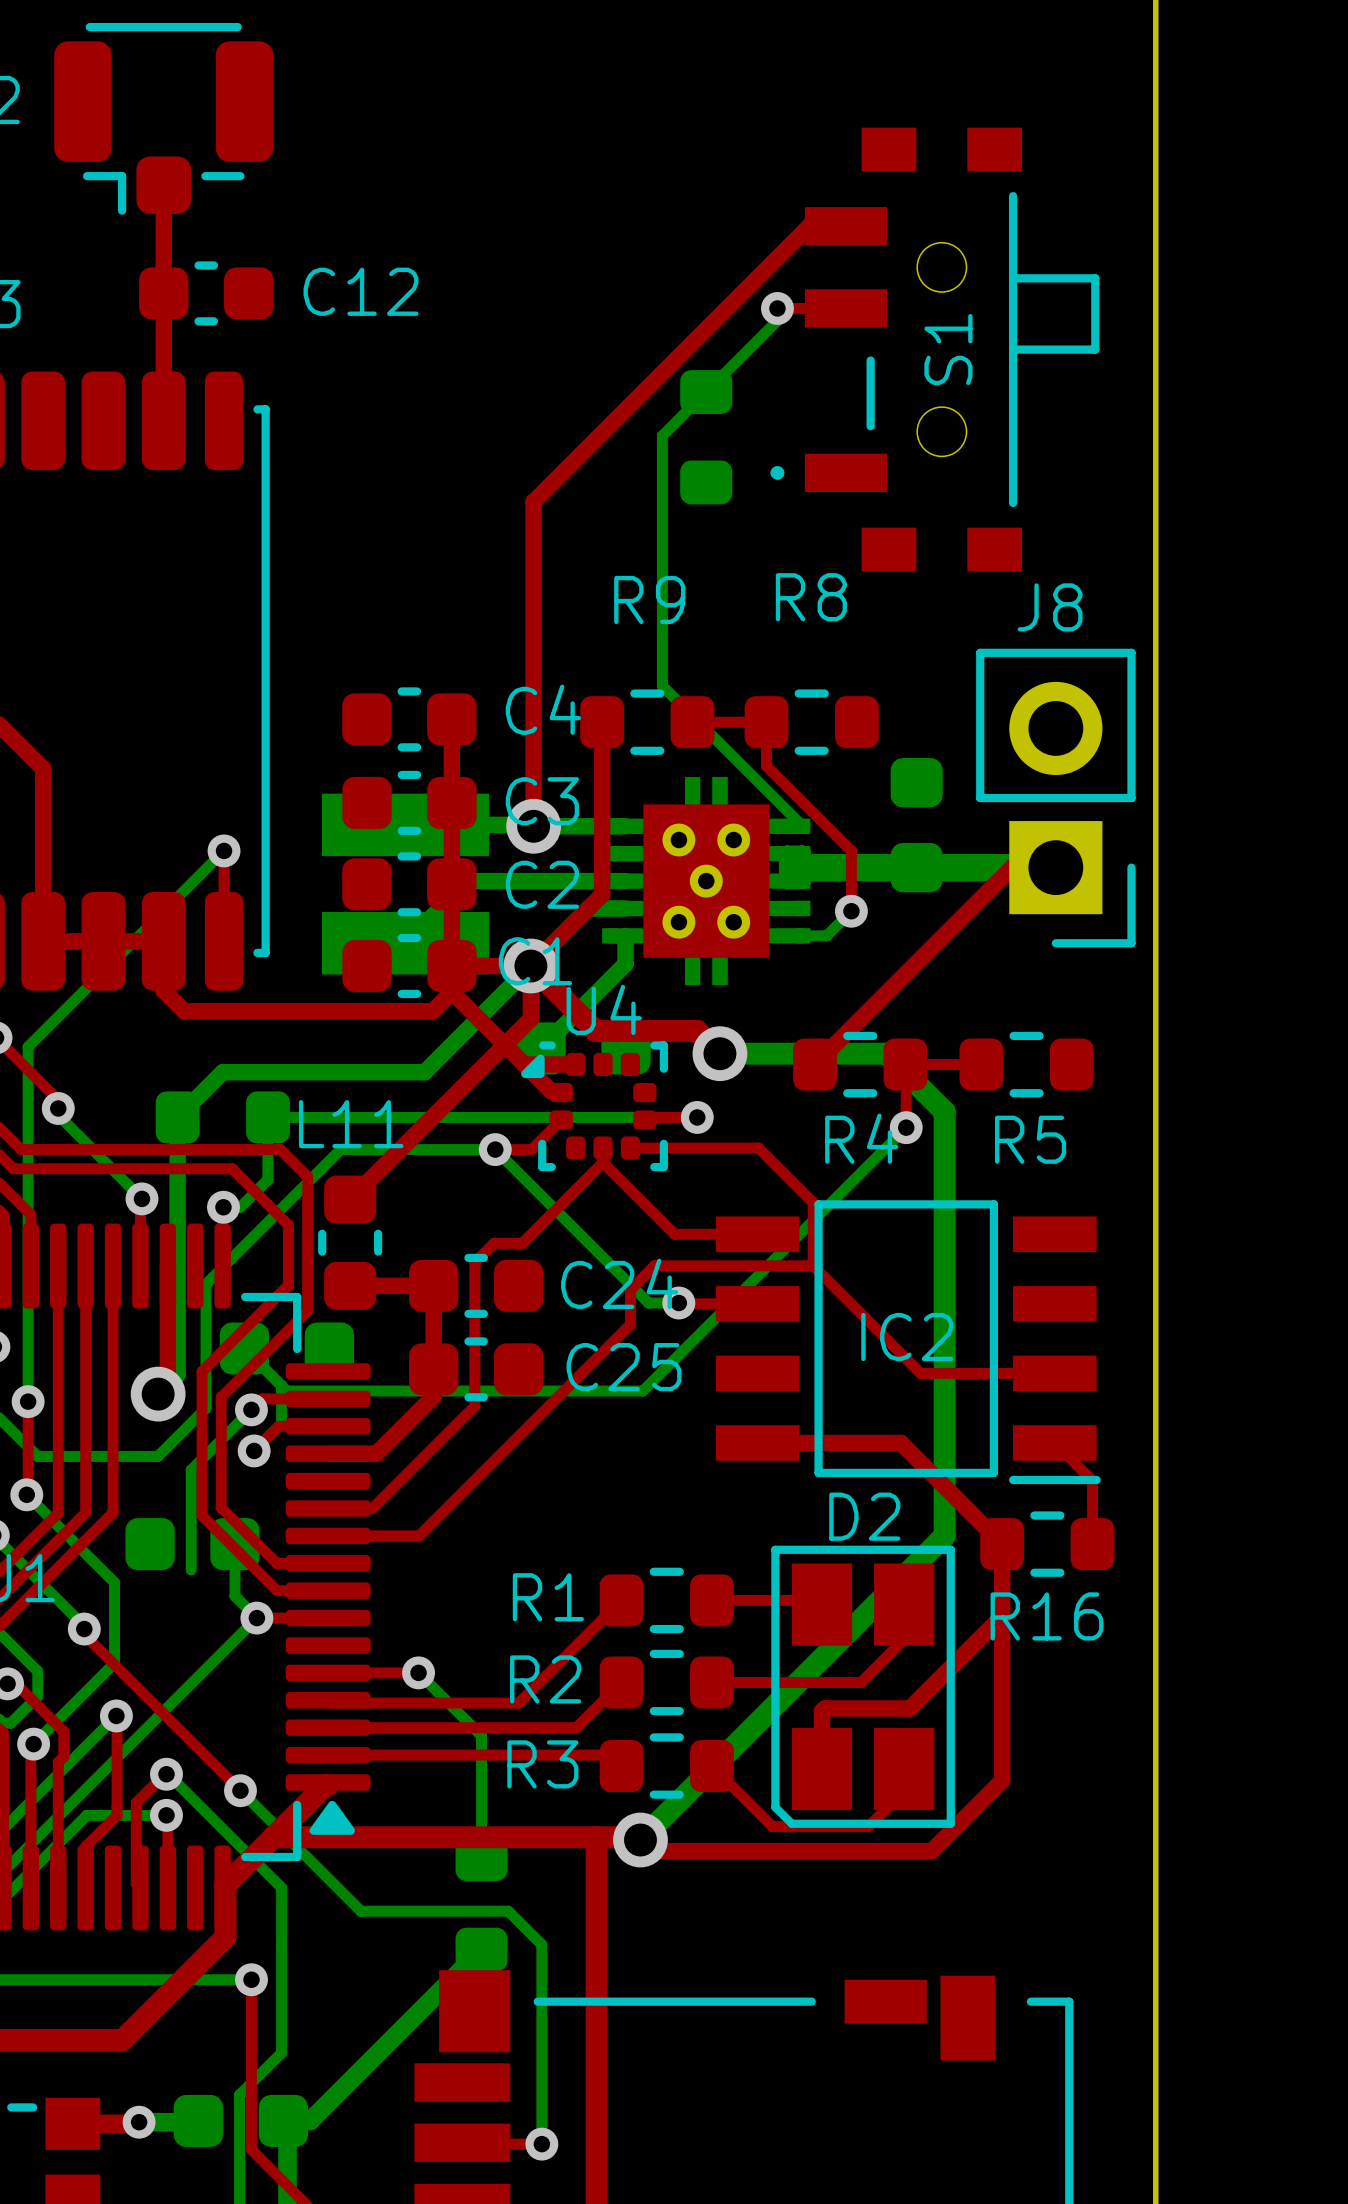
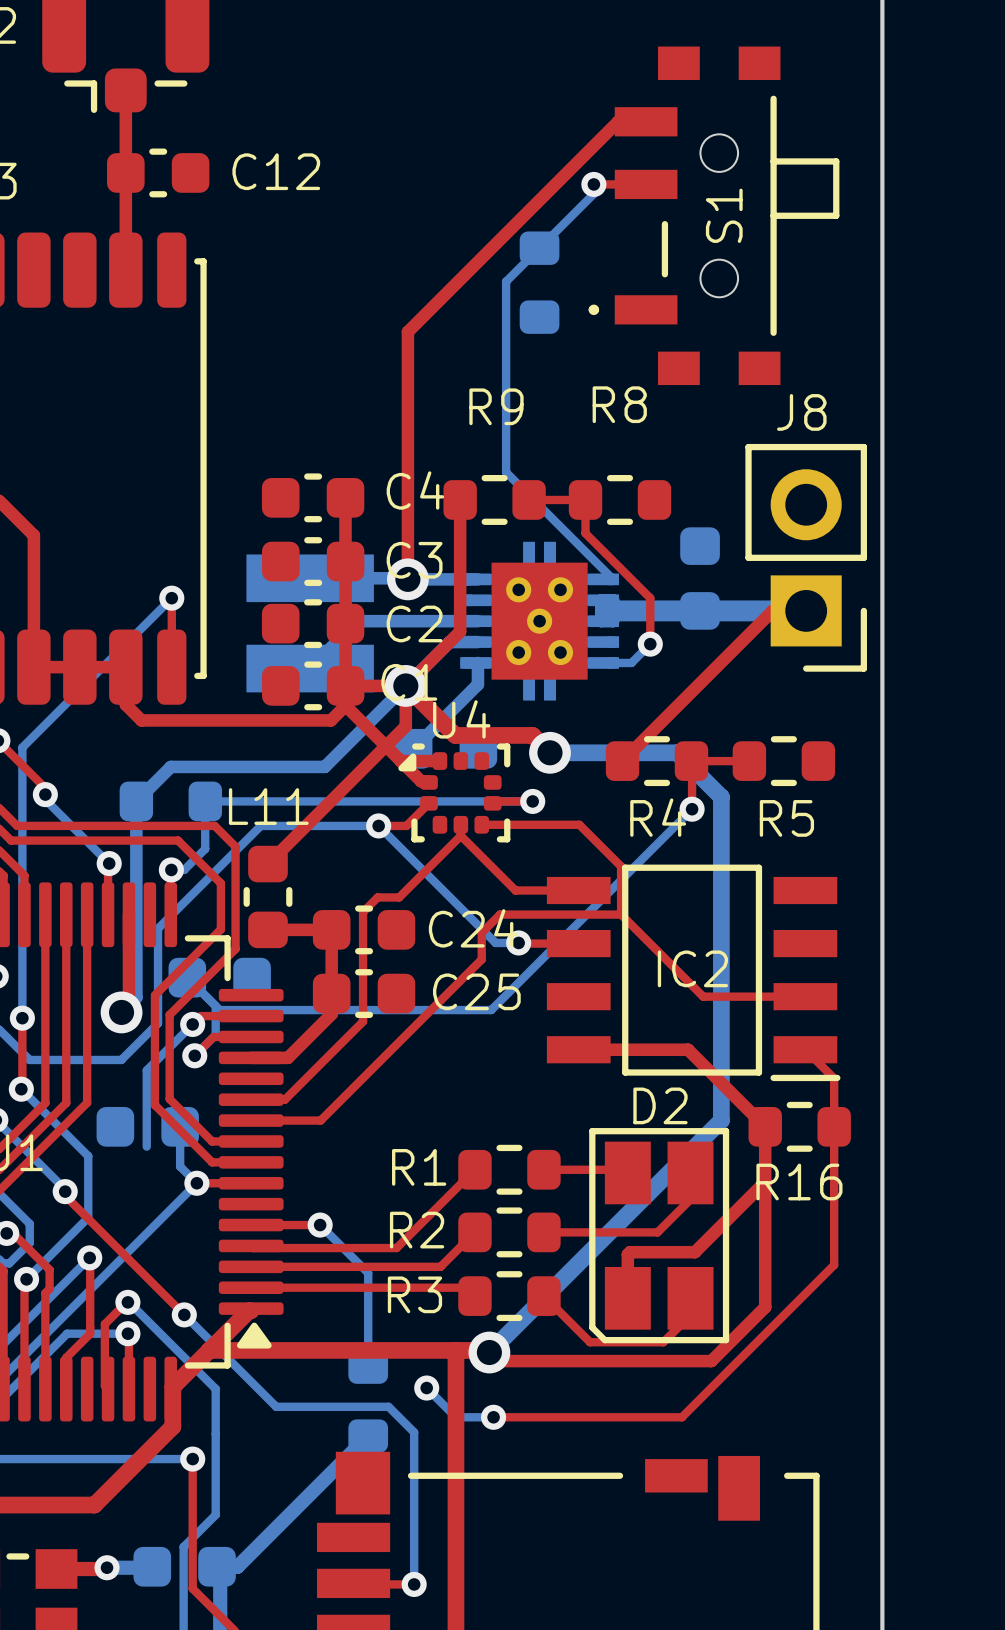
top track: none -> (834, 1126) (834, 1265) (681, 1417) (493, 1417)
bottom track: none -> (426, 1388) (455, 1417) (493, 1417)
via: none -> (426, 1388)
via: none -> (493, 1417)

